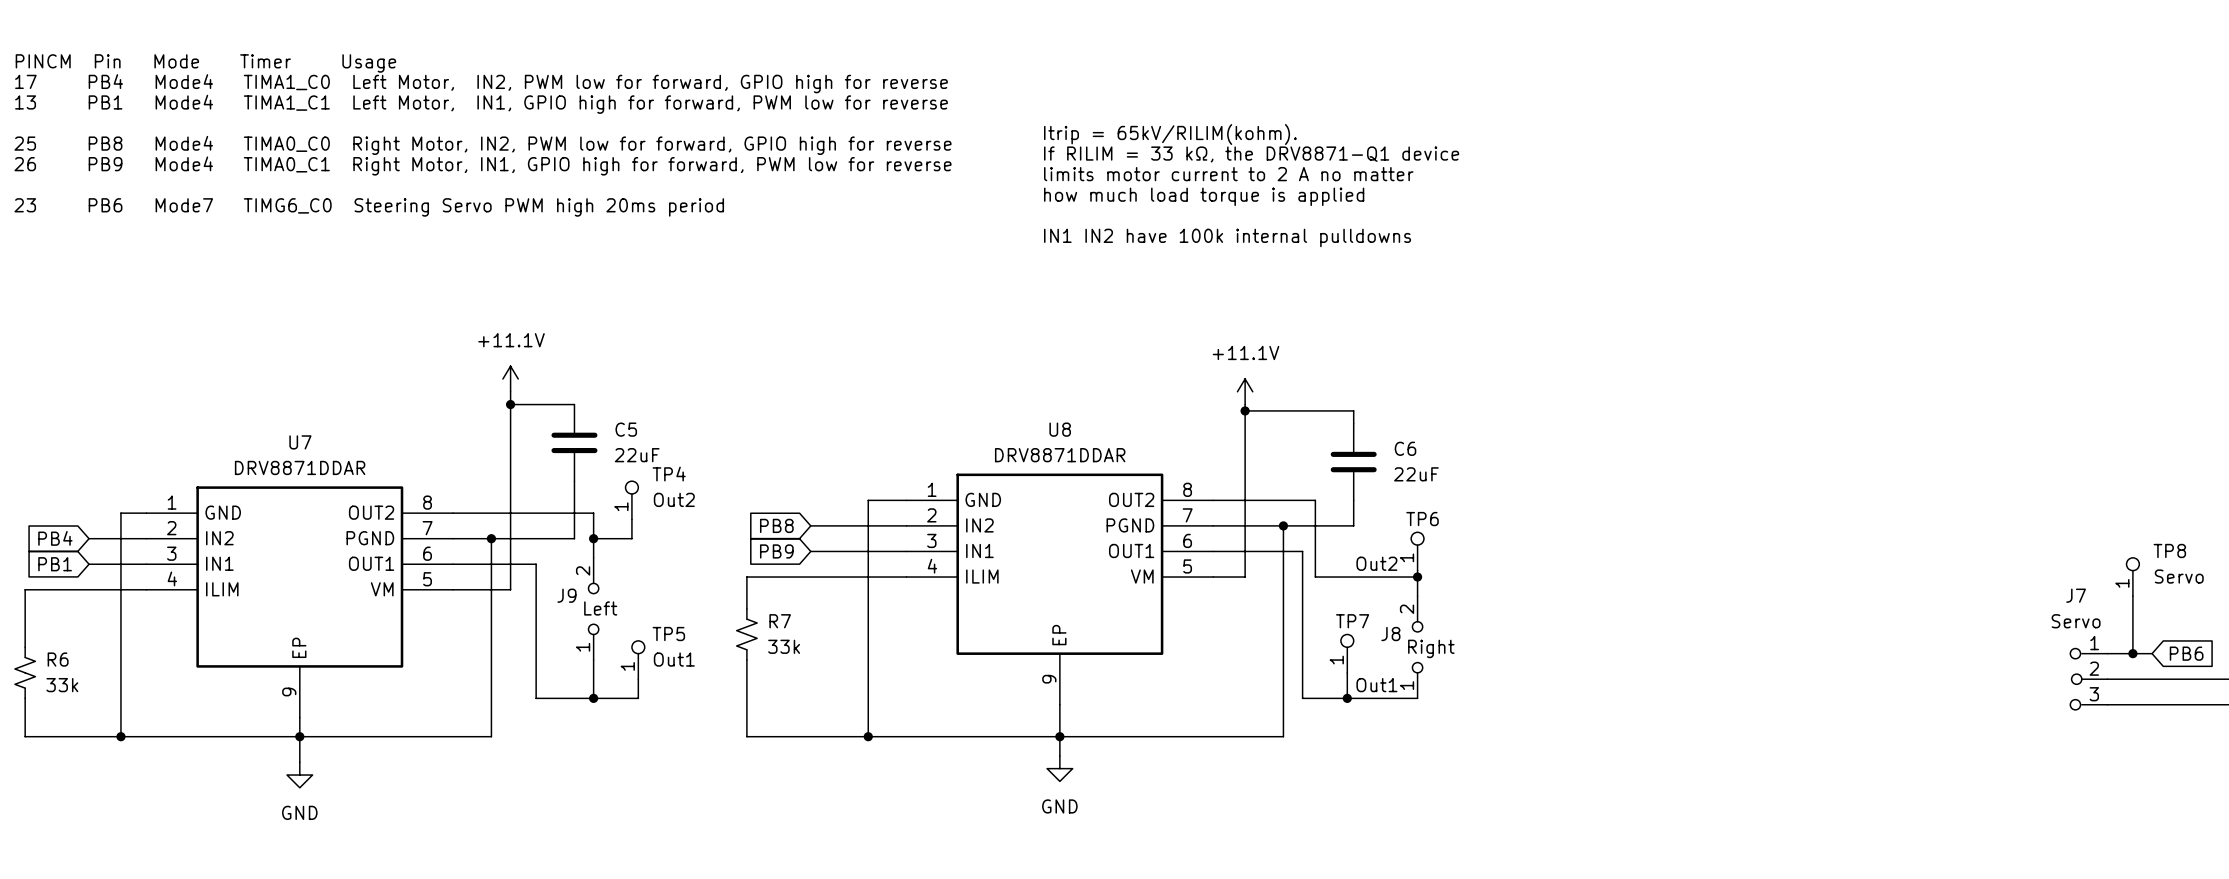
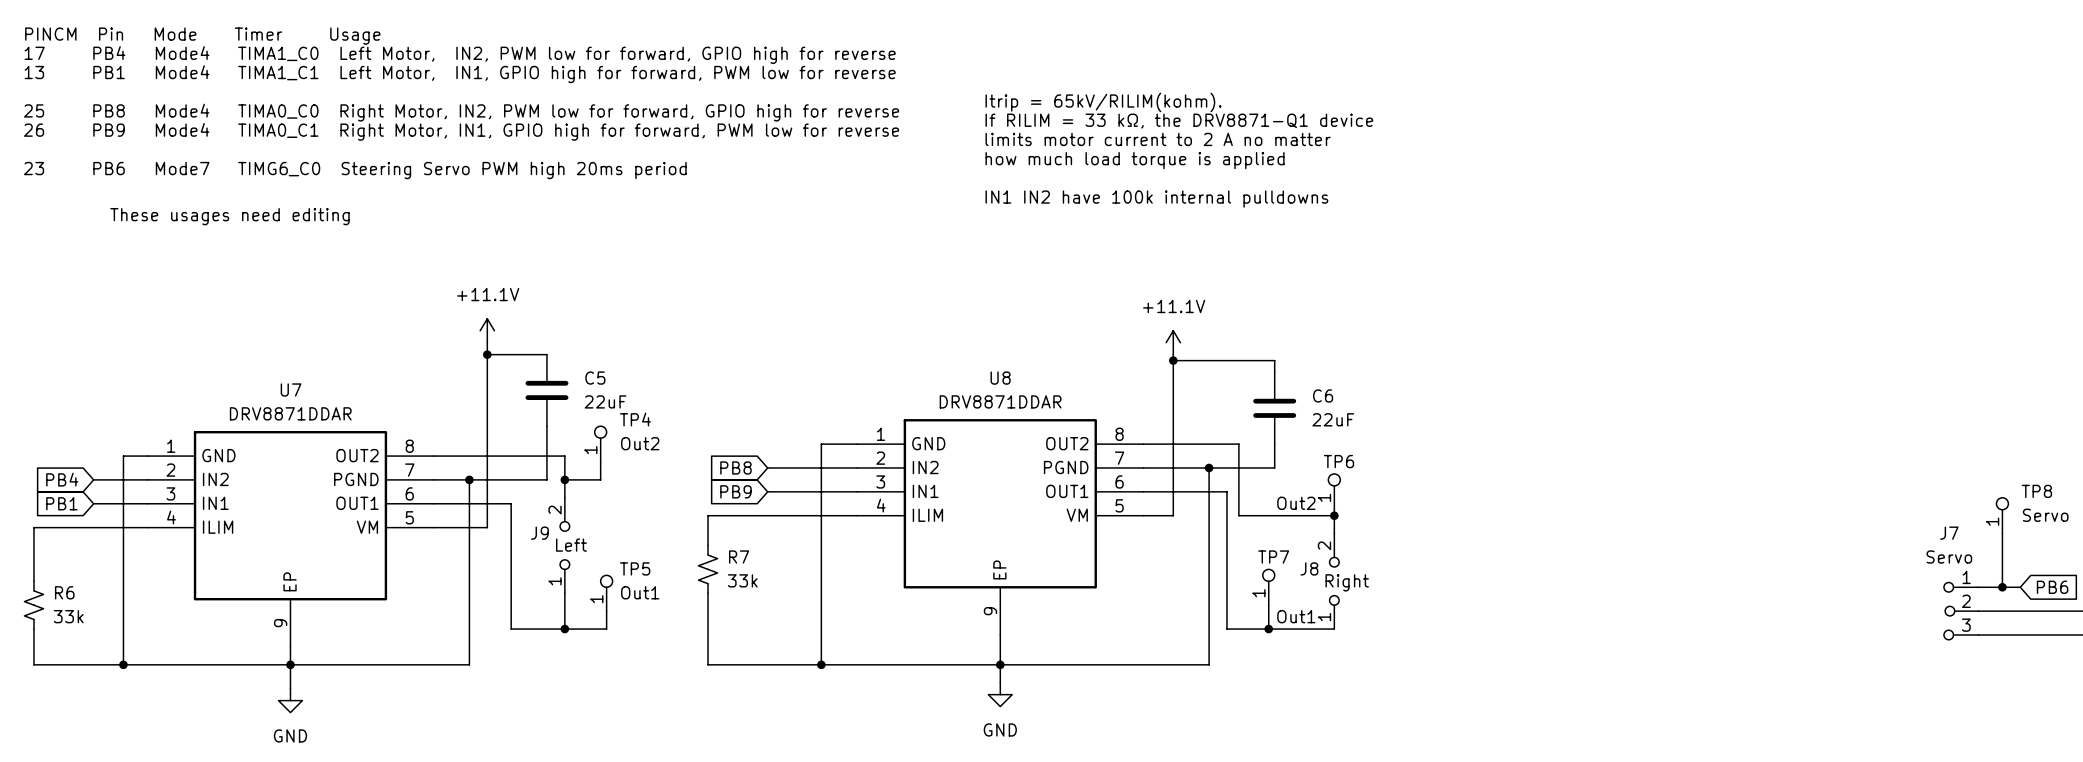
text: none -> These usages need editing (229, 216)

